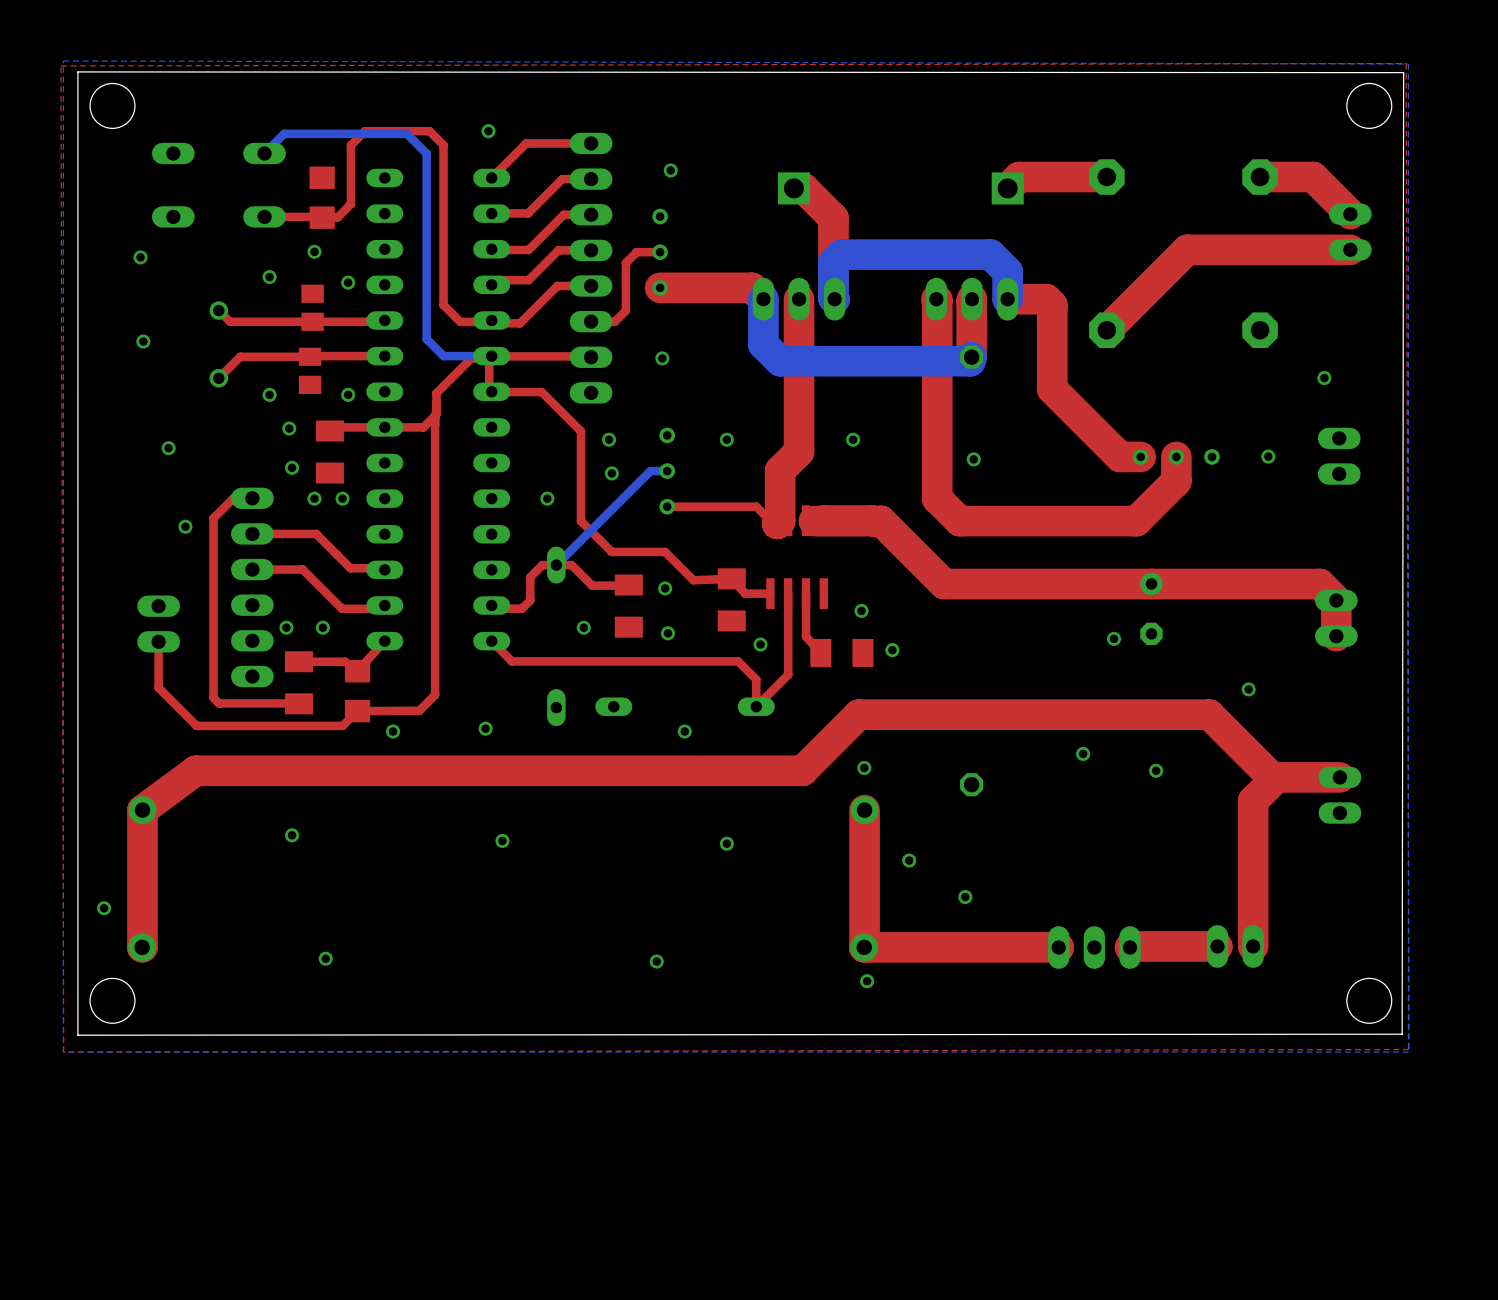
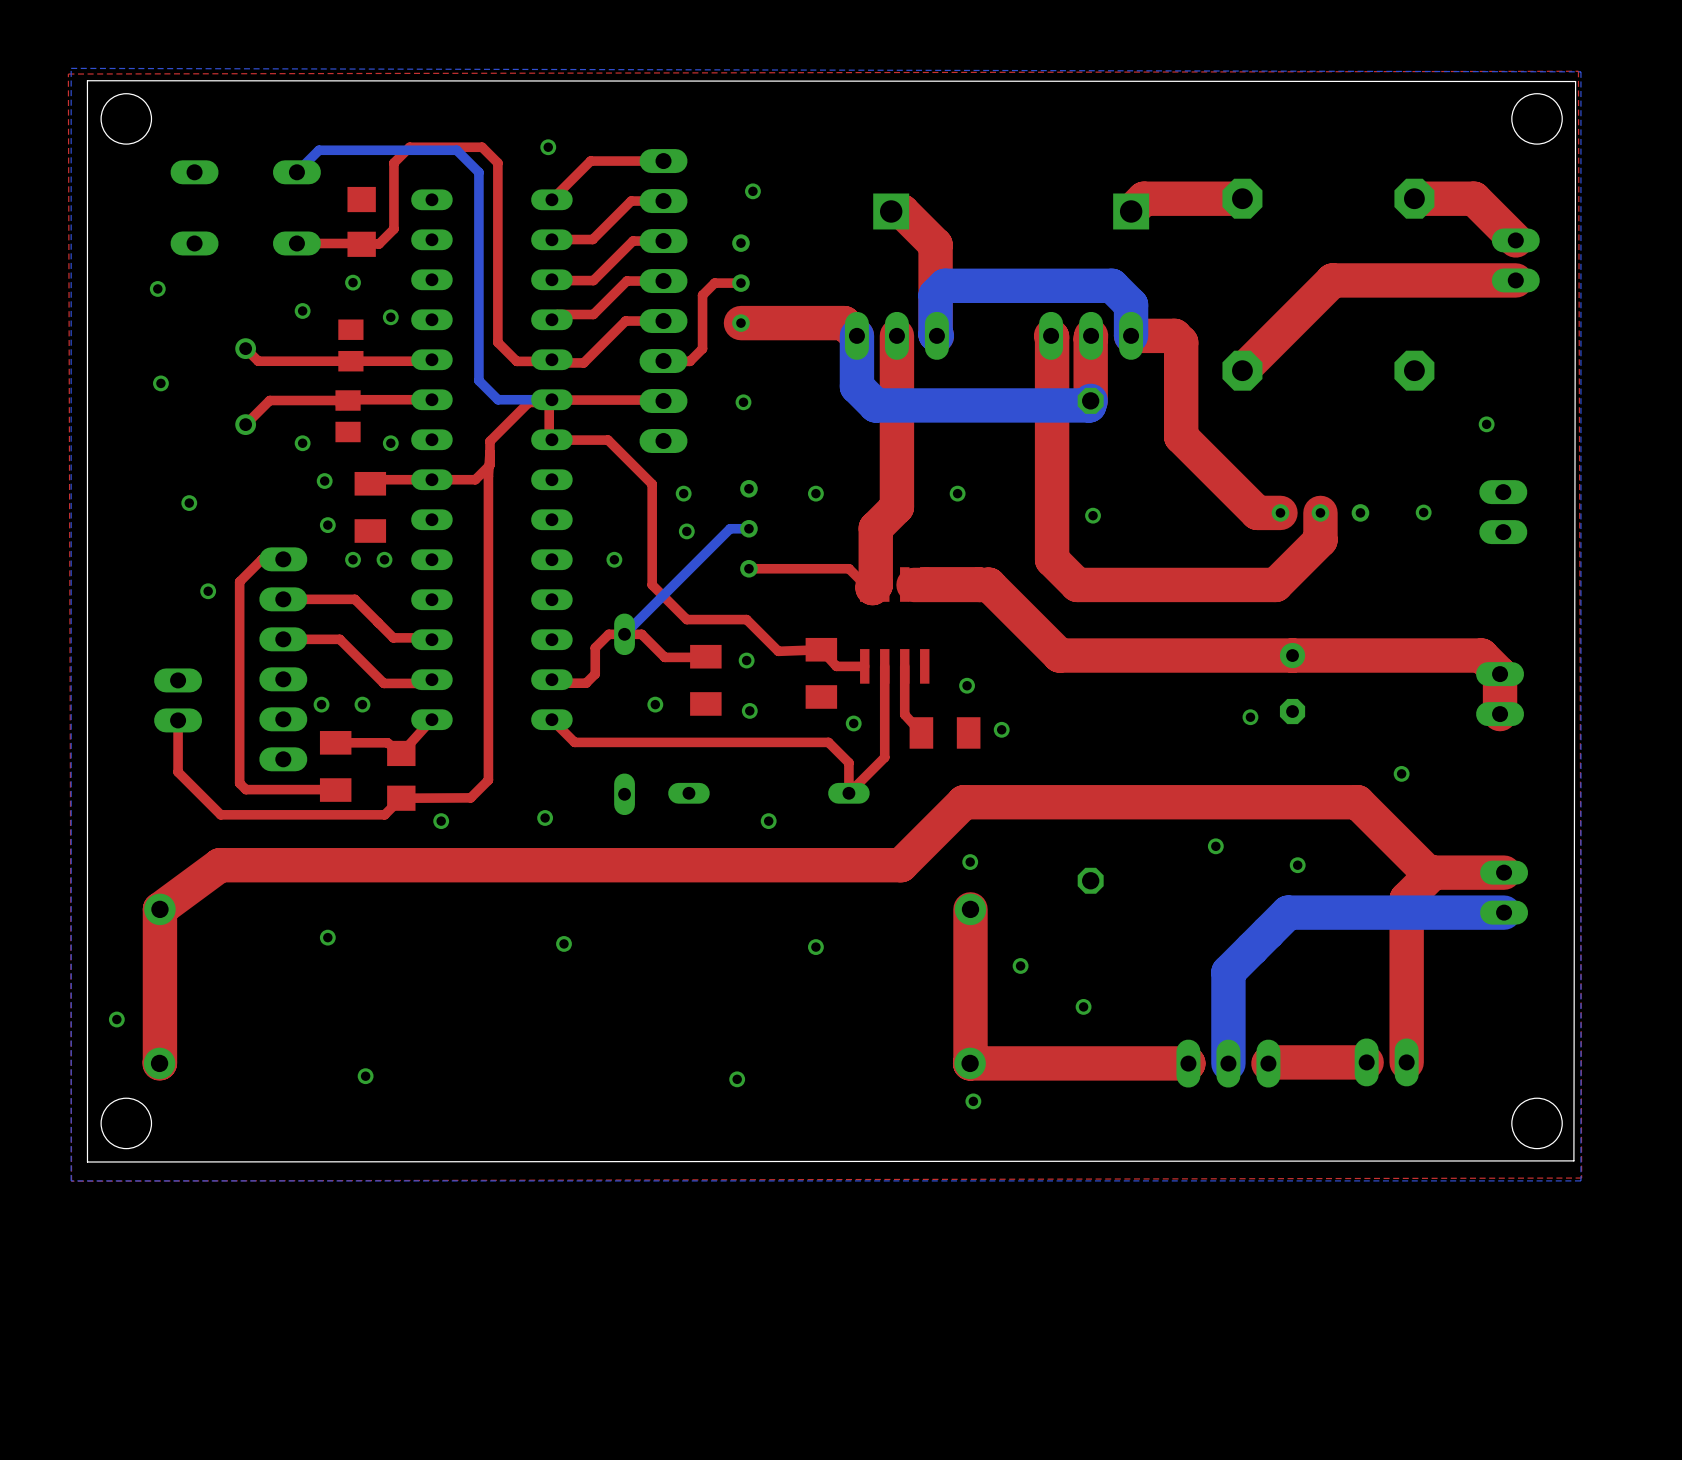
bottom track: none -> (1504, 912) (1288, 912) (1228, 972) (1228, 1063)

